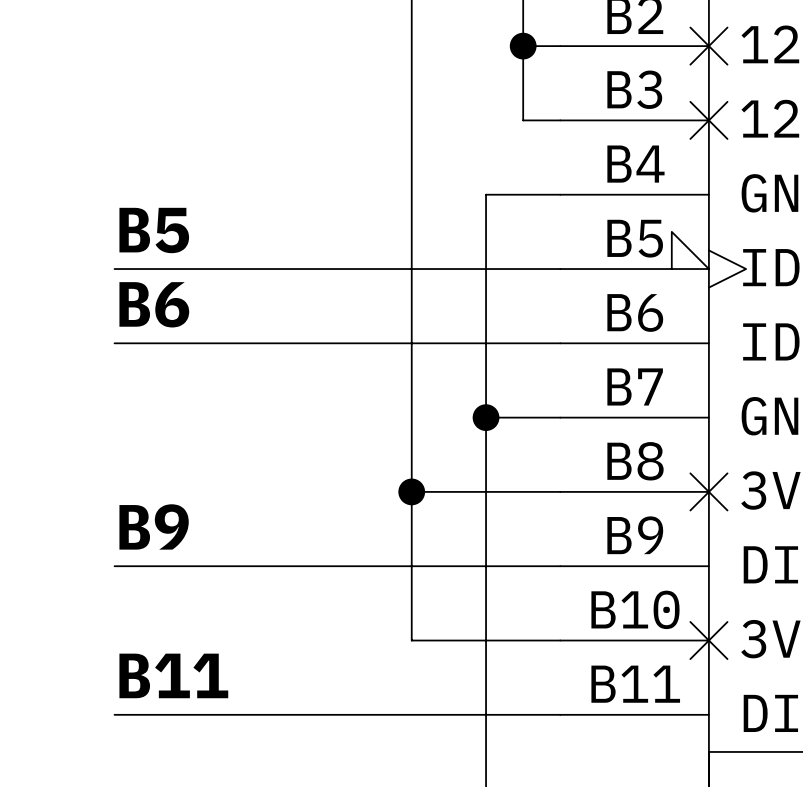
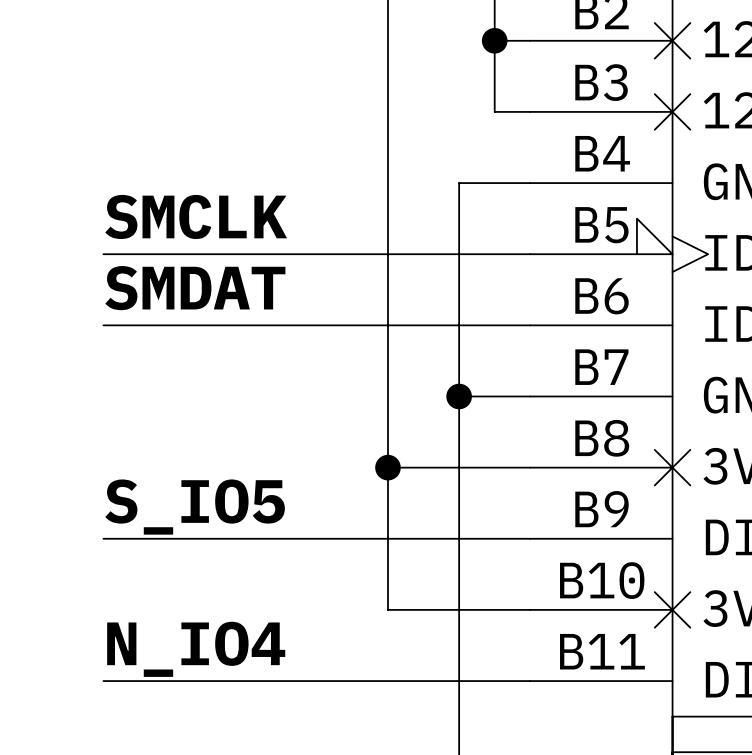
label: B5 (154, 230) -> SMCLK (196, 216)
label: B6 (154, 304) -> SMDAT (195, 288)
label: B9 (154, 526) -> S_IO5 (195, 507)
label: B11 (173, 675) -> N_IO4 (196, 649)

